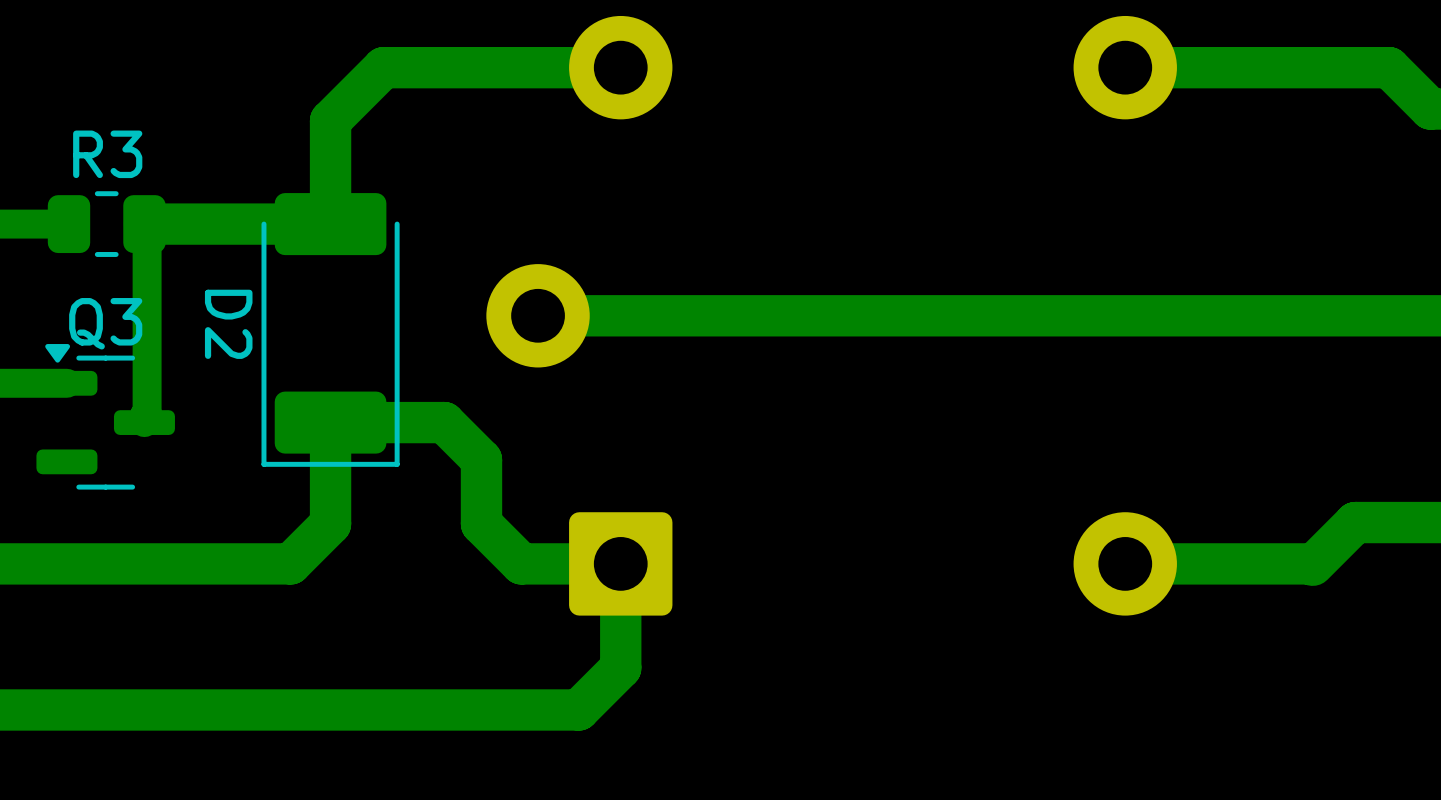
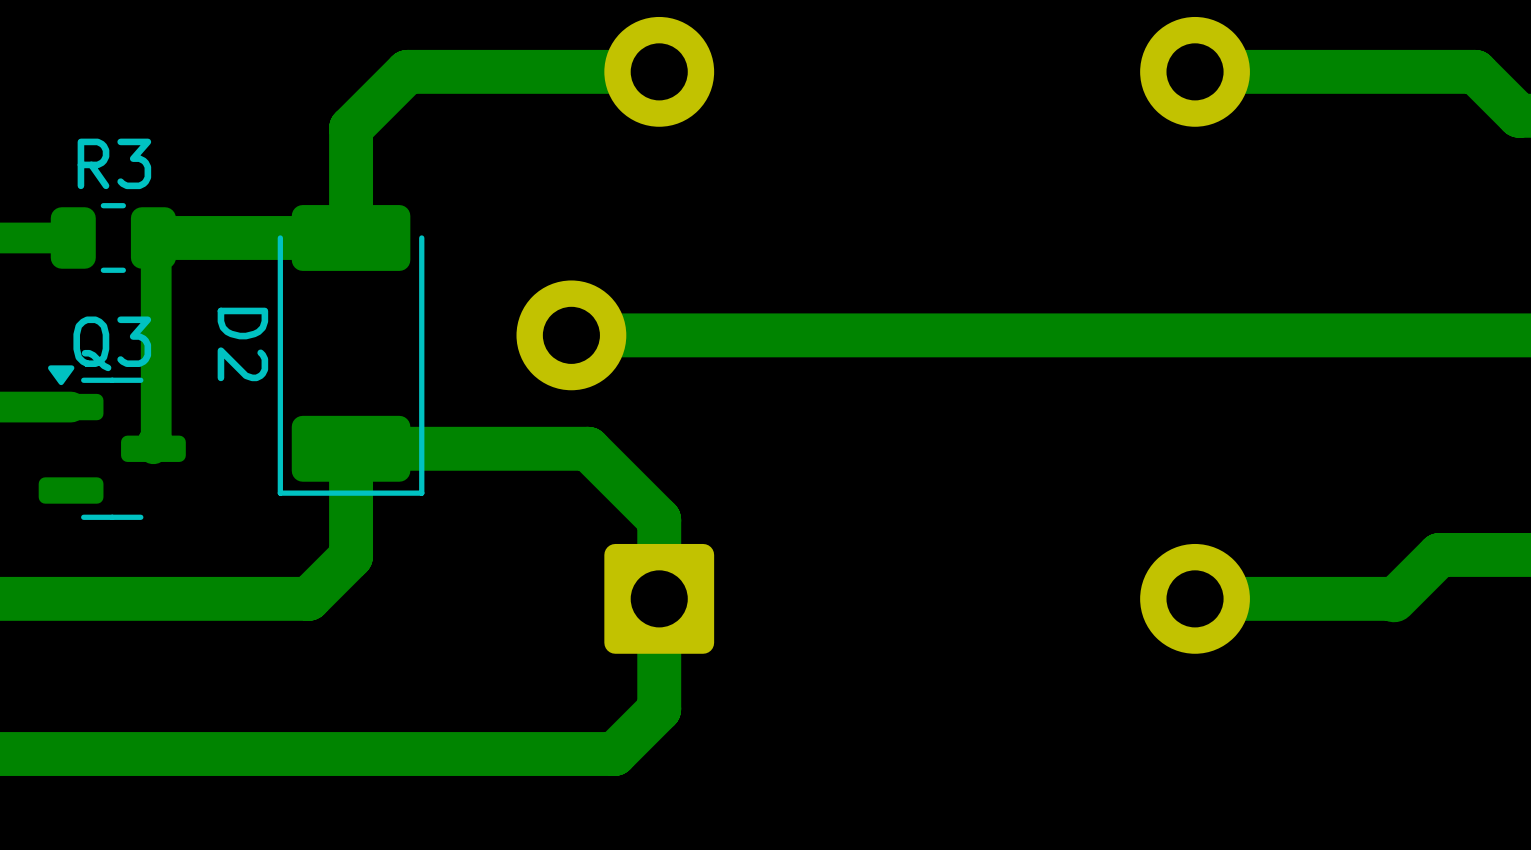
bottom track: (444, 422) (481, 459) (481, 523) (521, 563) (620, 563) -> (471, 448) (588, 448) (659, 519) (659, 598)

